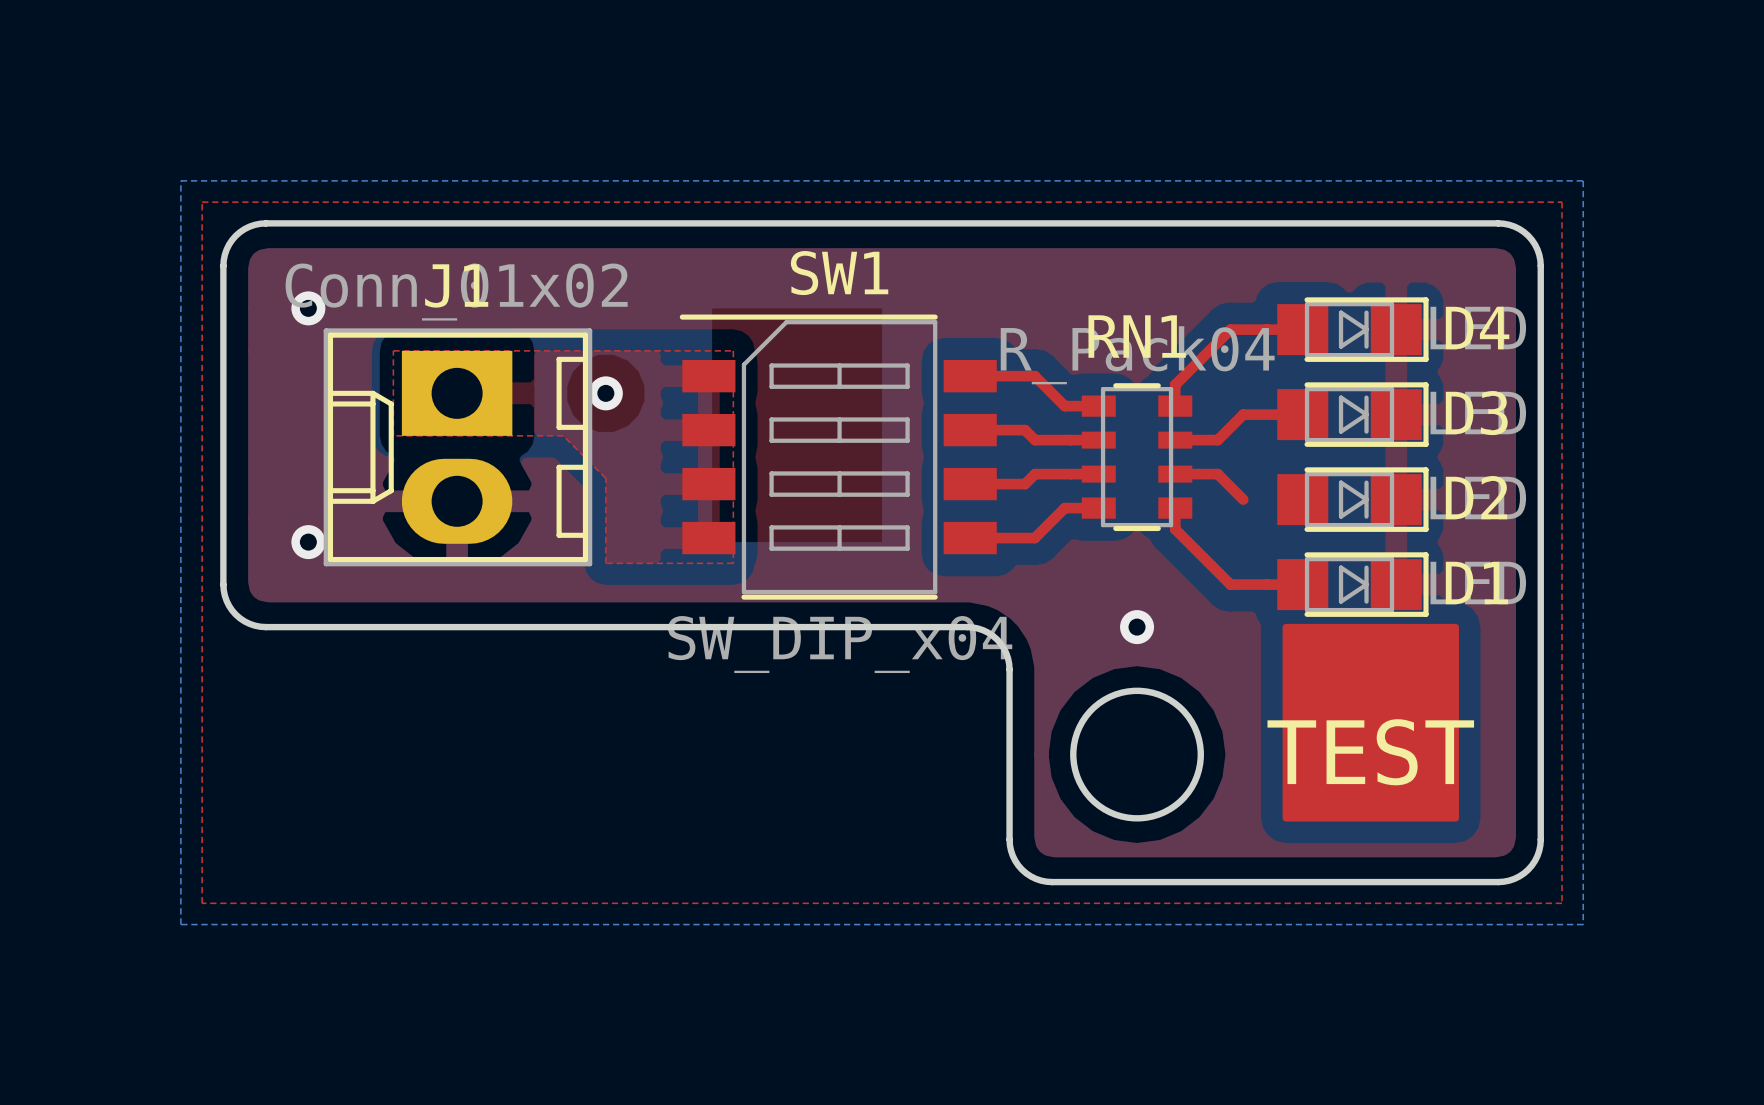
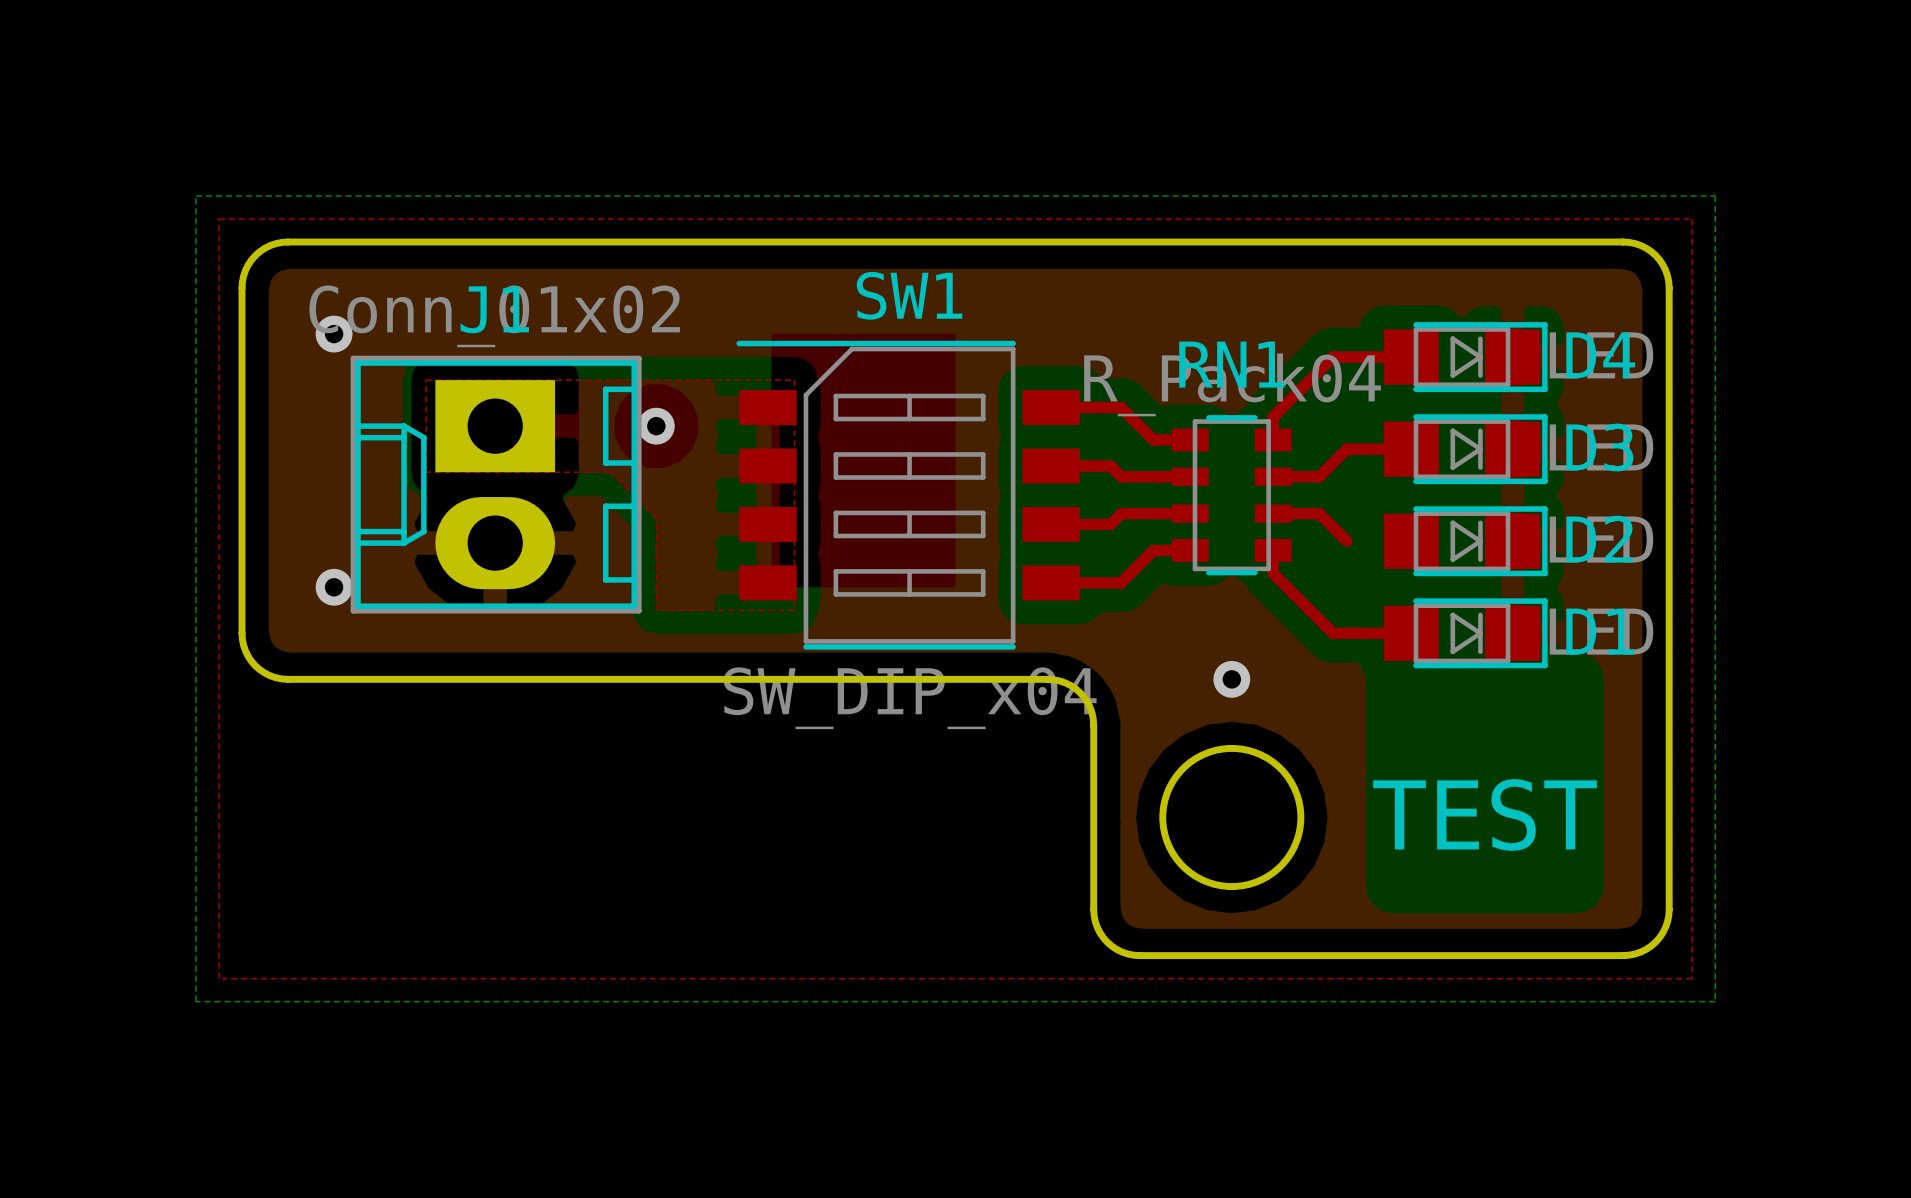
drawing: [1282, 623, 1459, 822] -> none

